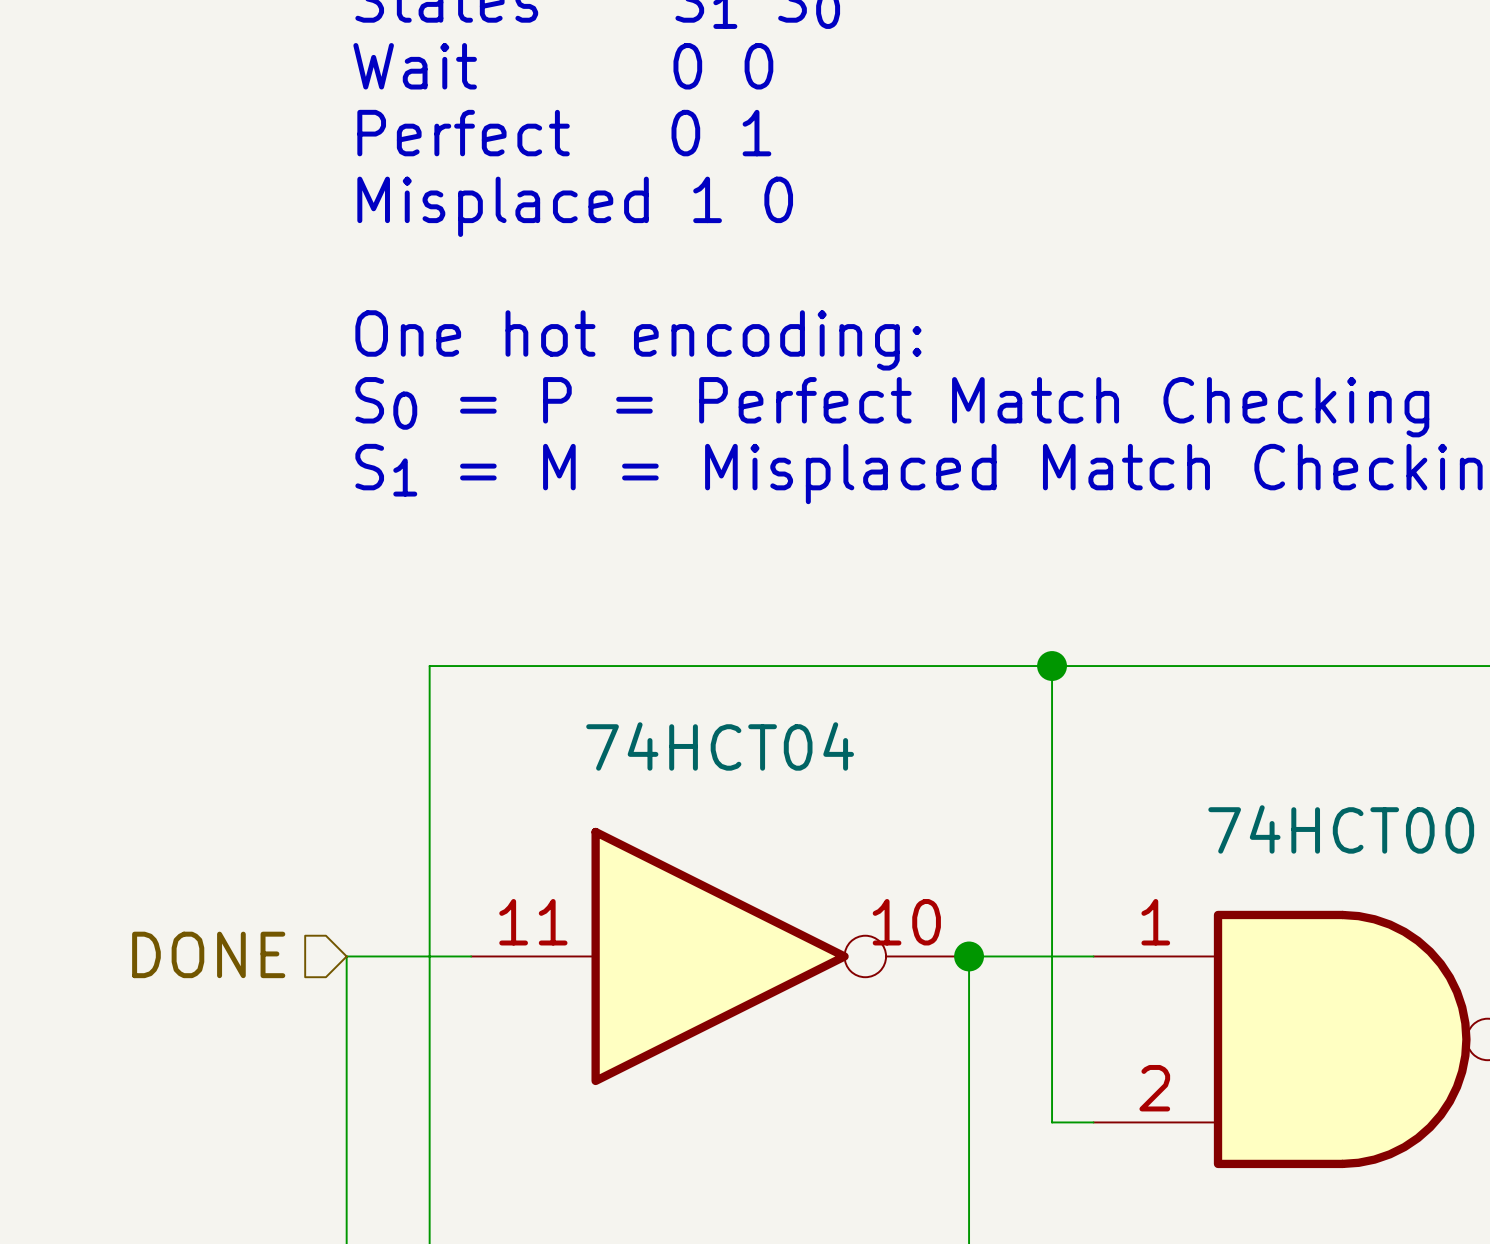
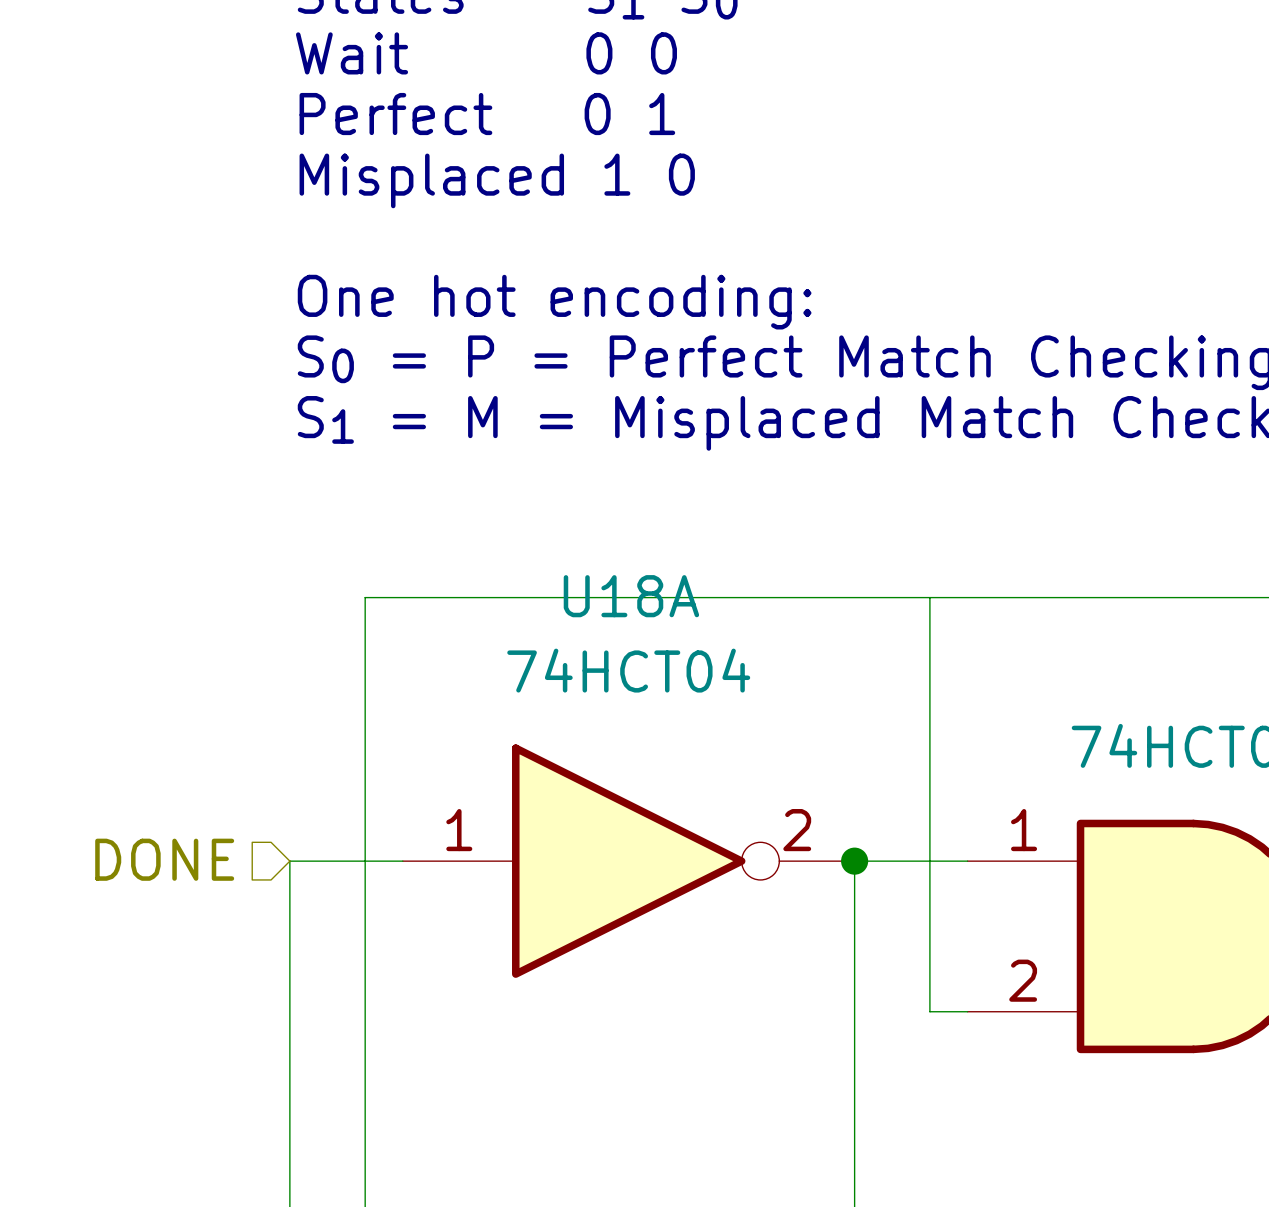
U18A name: none -> U18A (631, 596)
junction: (1052, 666) -> none
U18A pin number: 11 (533, 922) -> 1 (459, 830)
U18A pin number: 10 (906, 922) -> 2 (797, 830)

